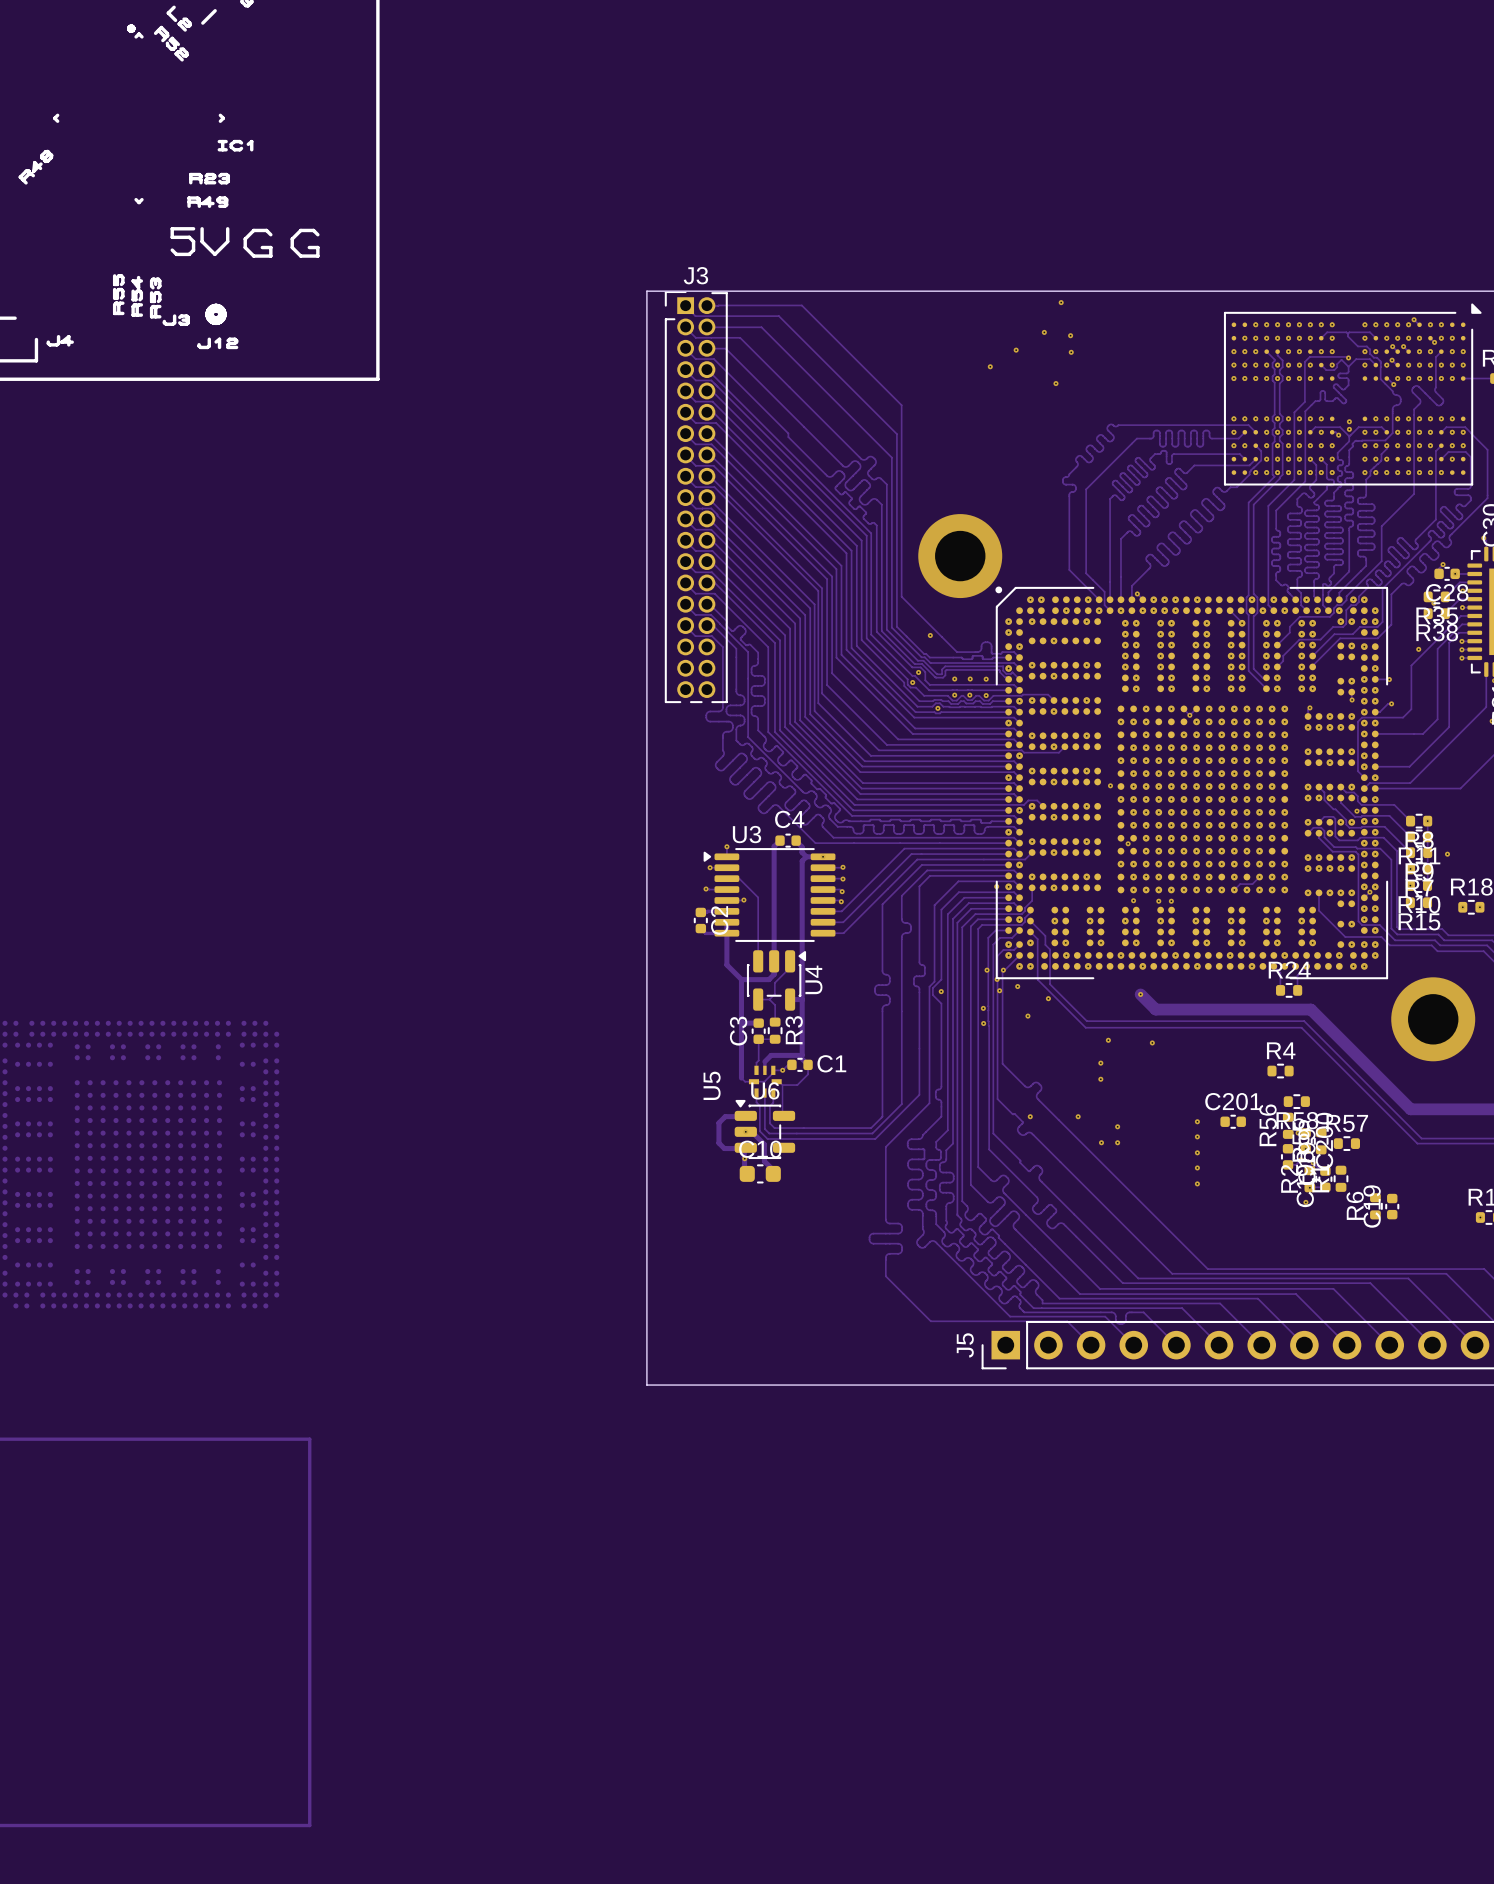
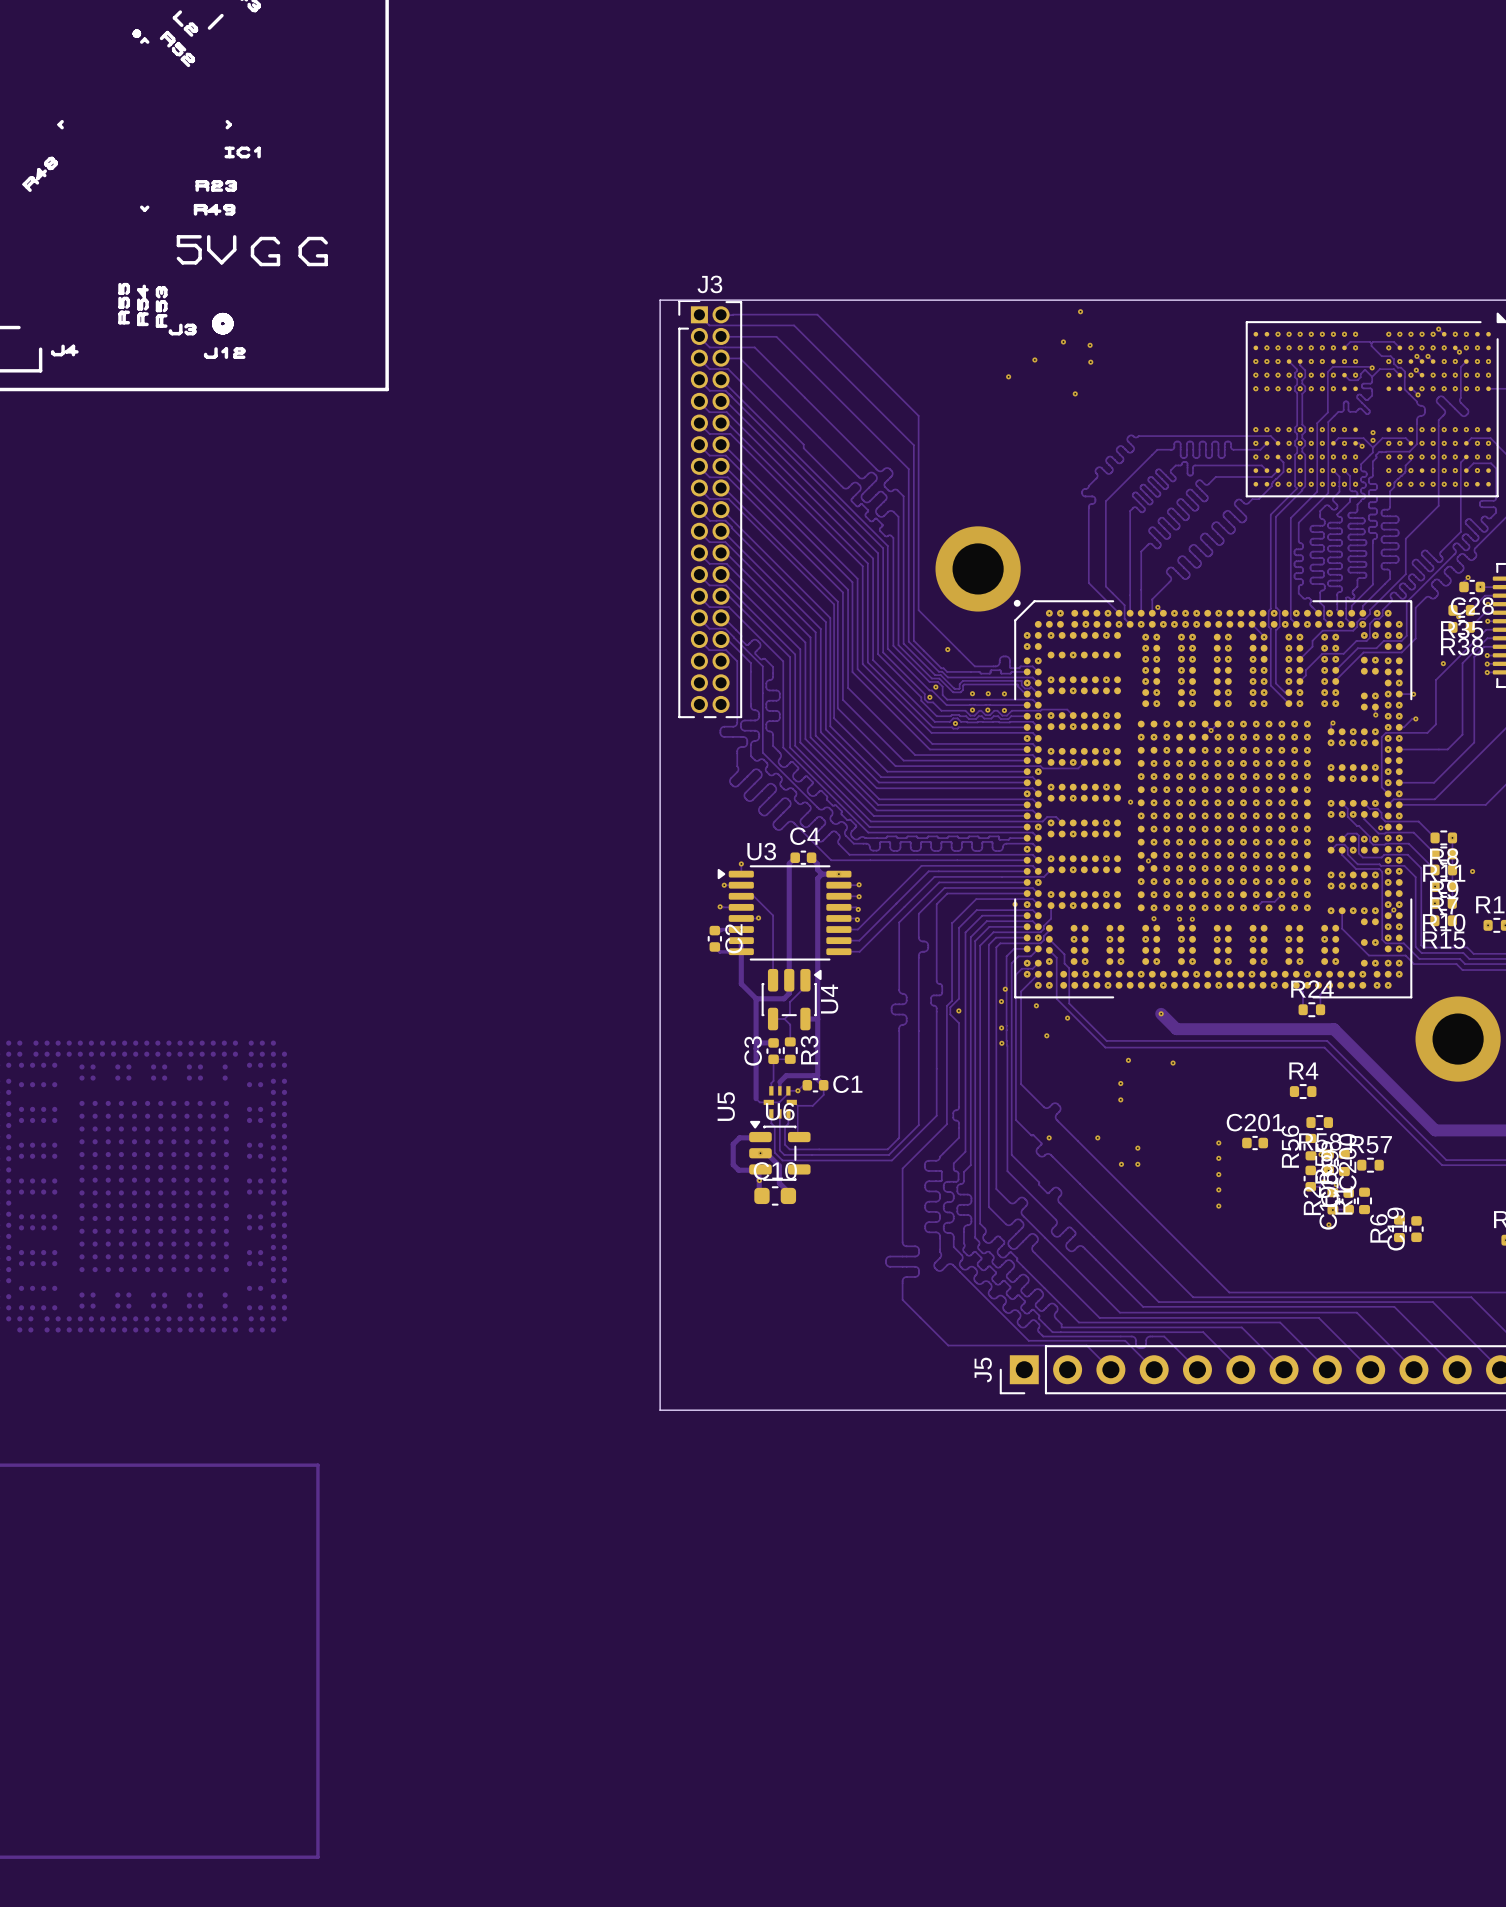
via: (1003, 970) -> none
via: (997, 979) -> none
via: none -> (1001, 1001)
via: (999, 990) -> none

